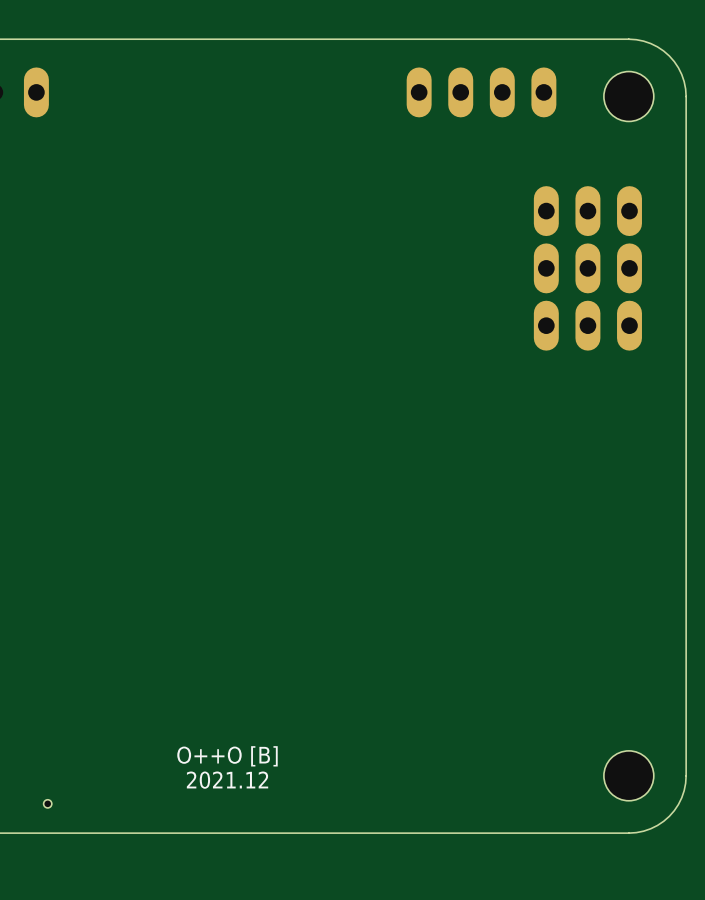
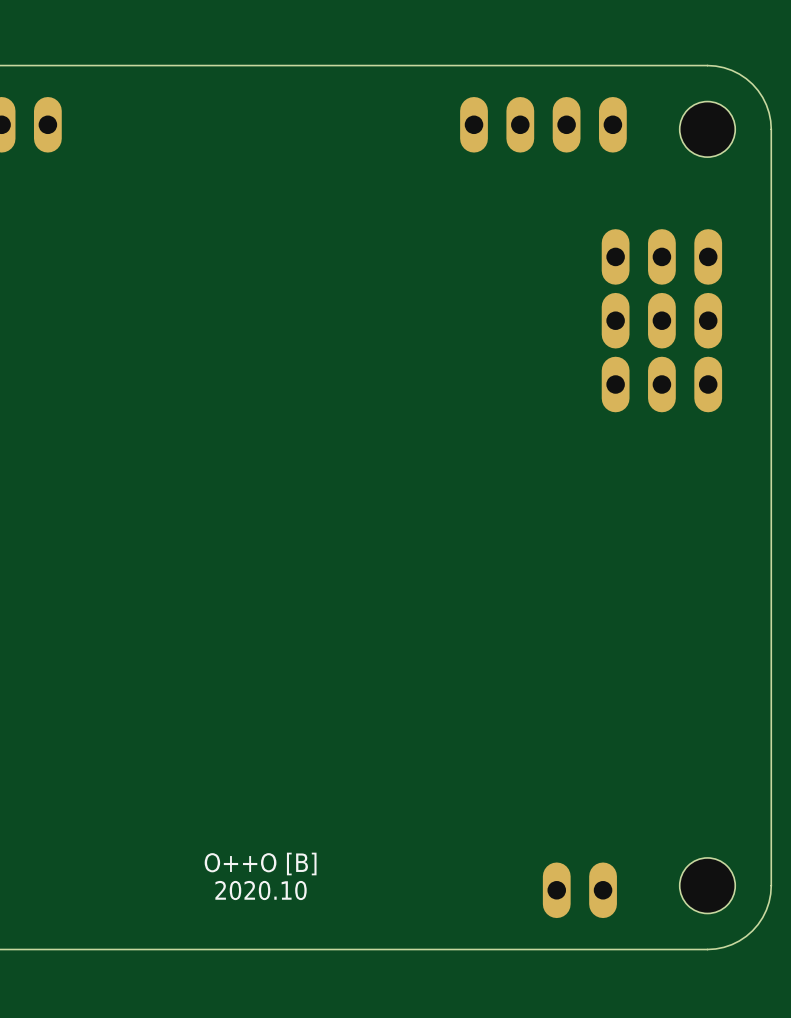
part: none -> (579, 890)
text: 2021.12 (227, 780) -> 2020.10 (261, 890)
part: (47, 803) -> none

